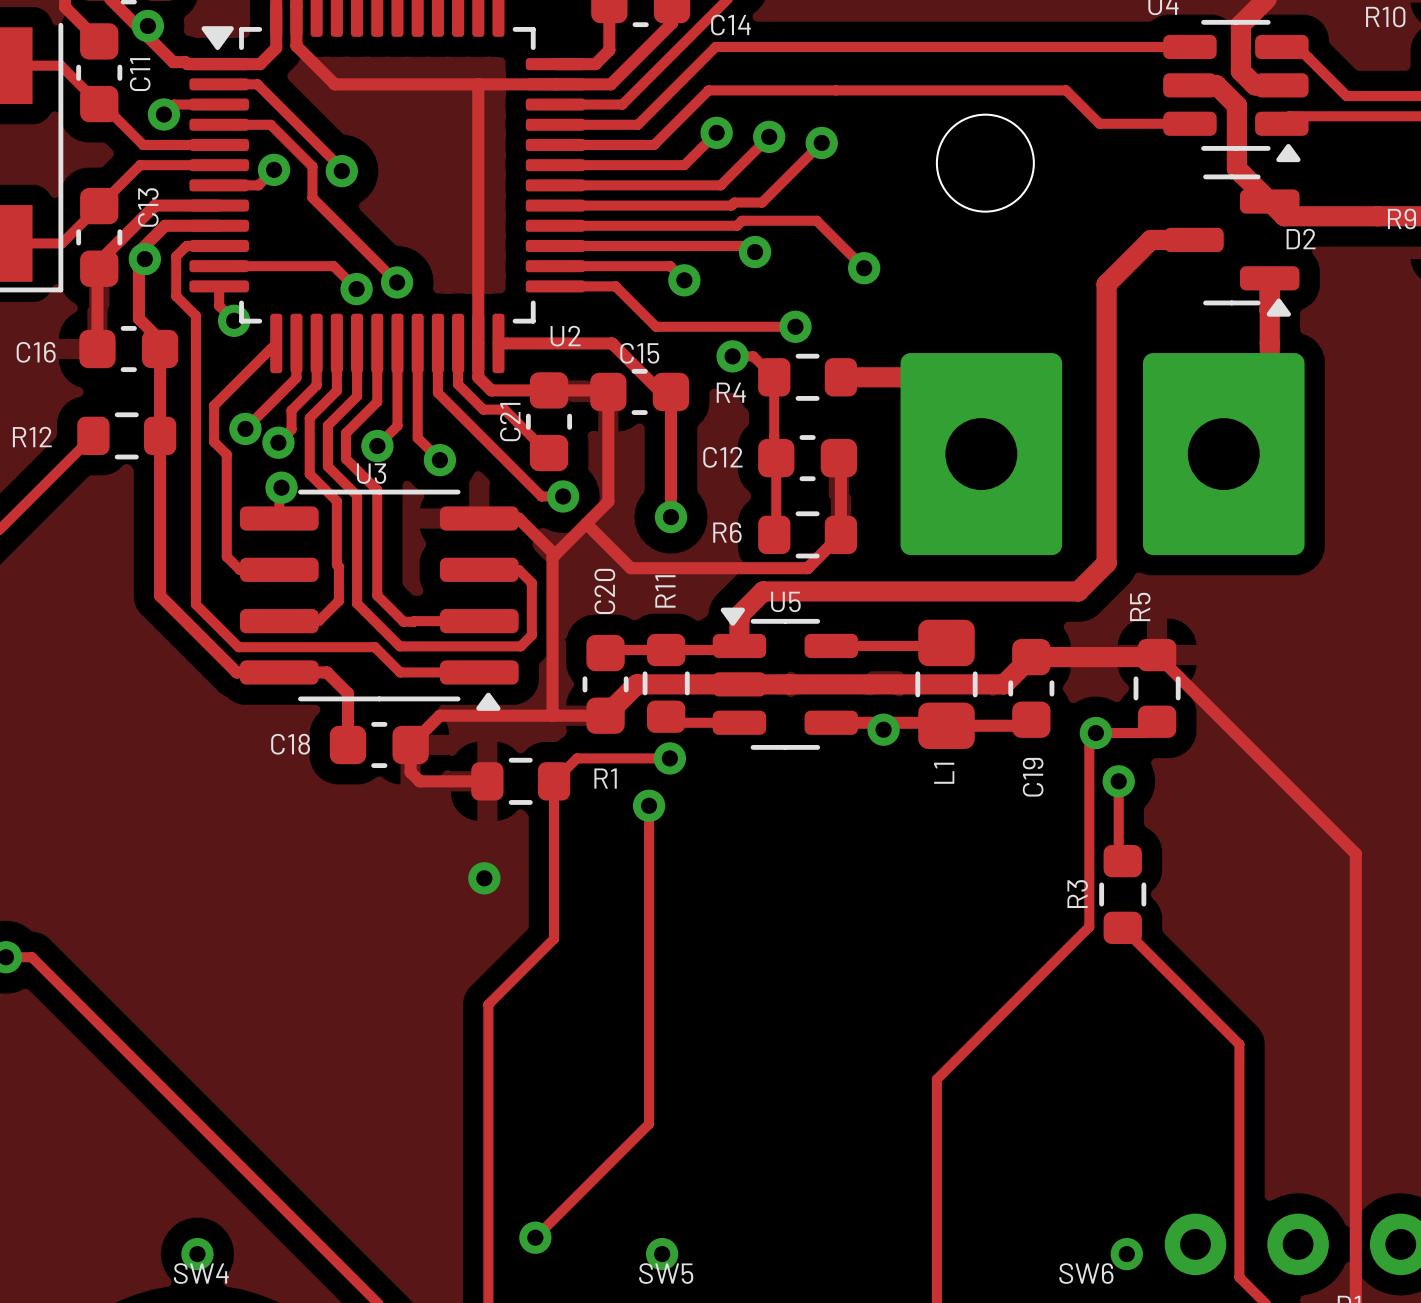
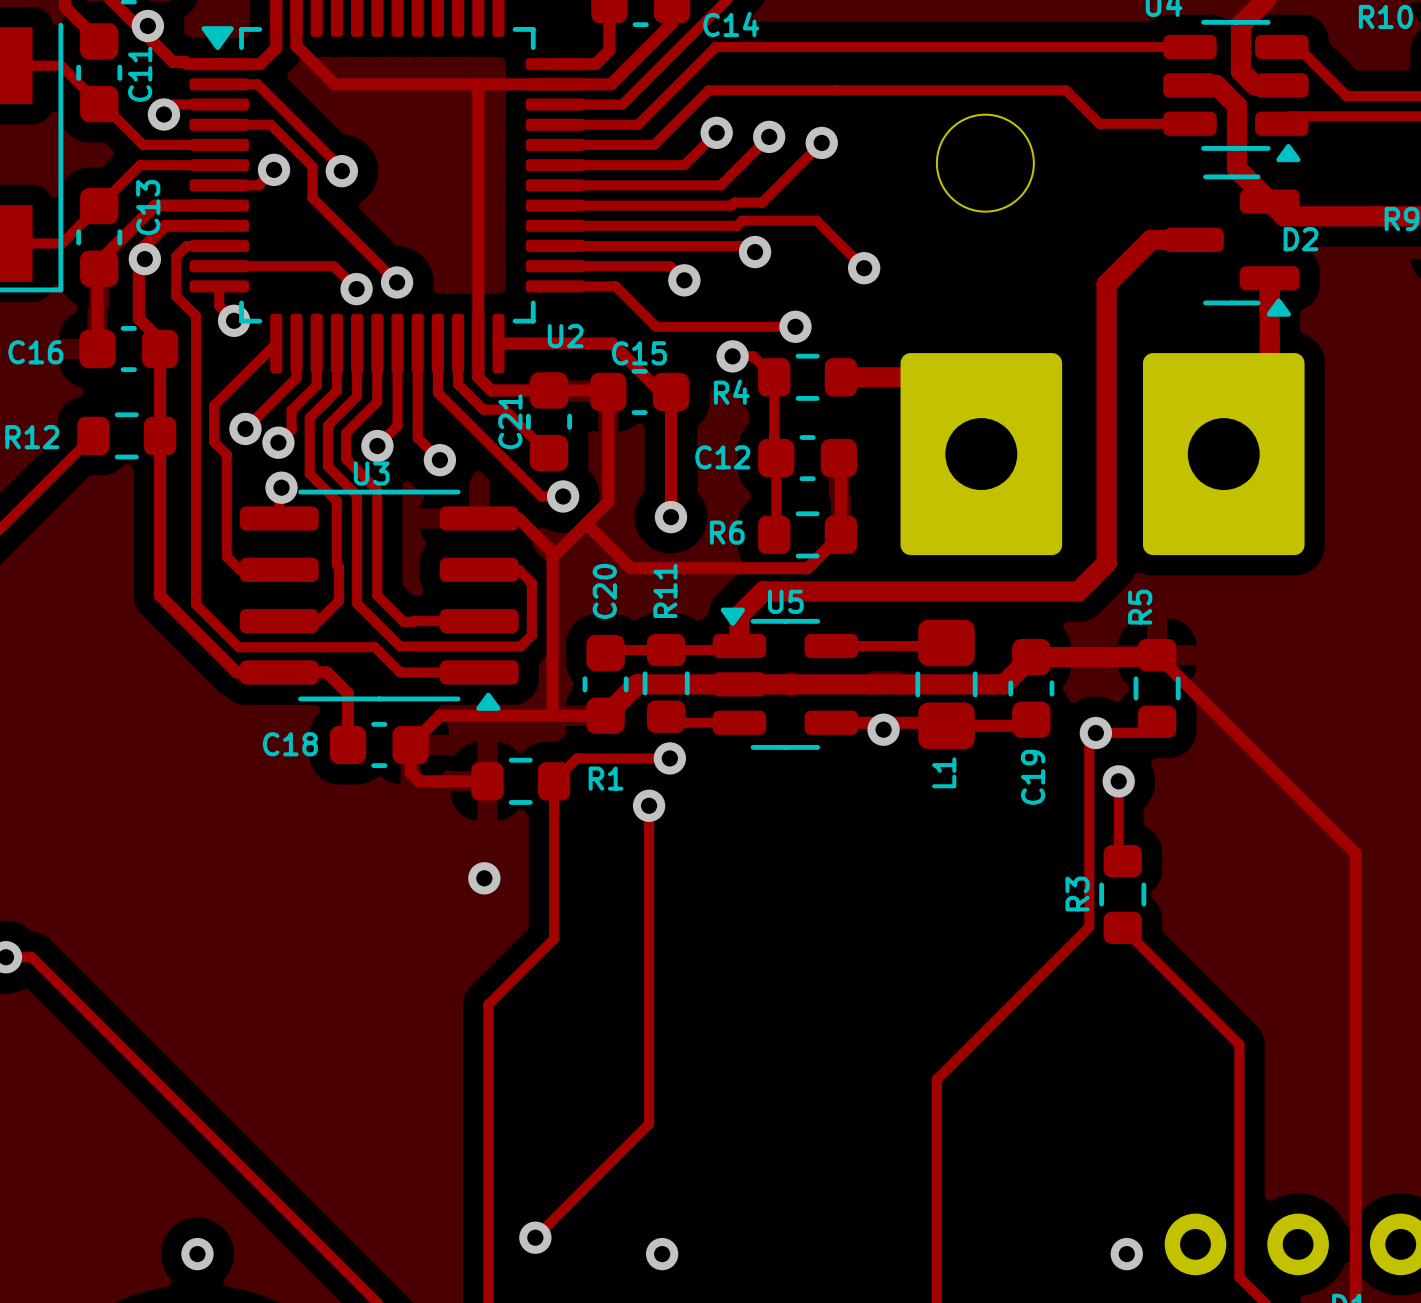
SW4 name: SW4 (201, 1273) -> none
SW5 name: SW5 (666, 1273) -> none
SW6 name: SW6 (1086, 1273) -> none

